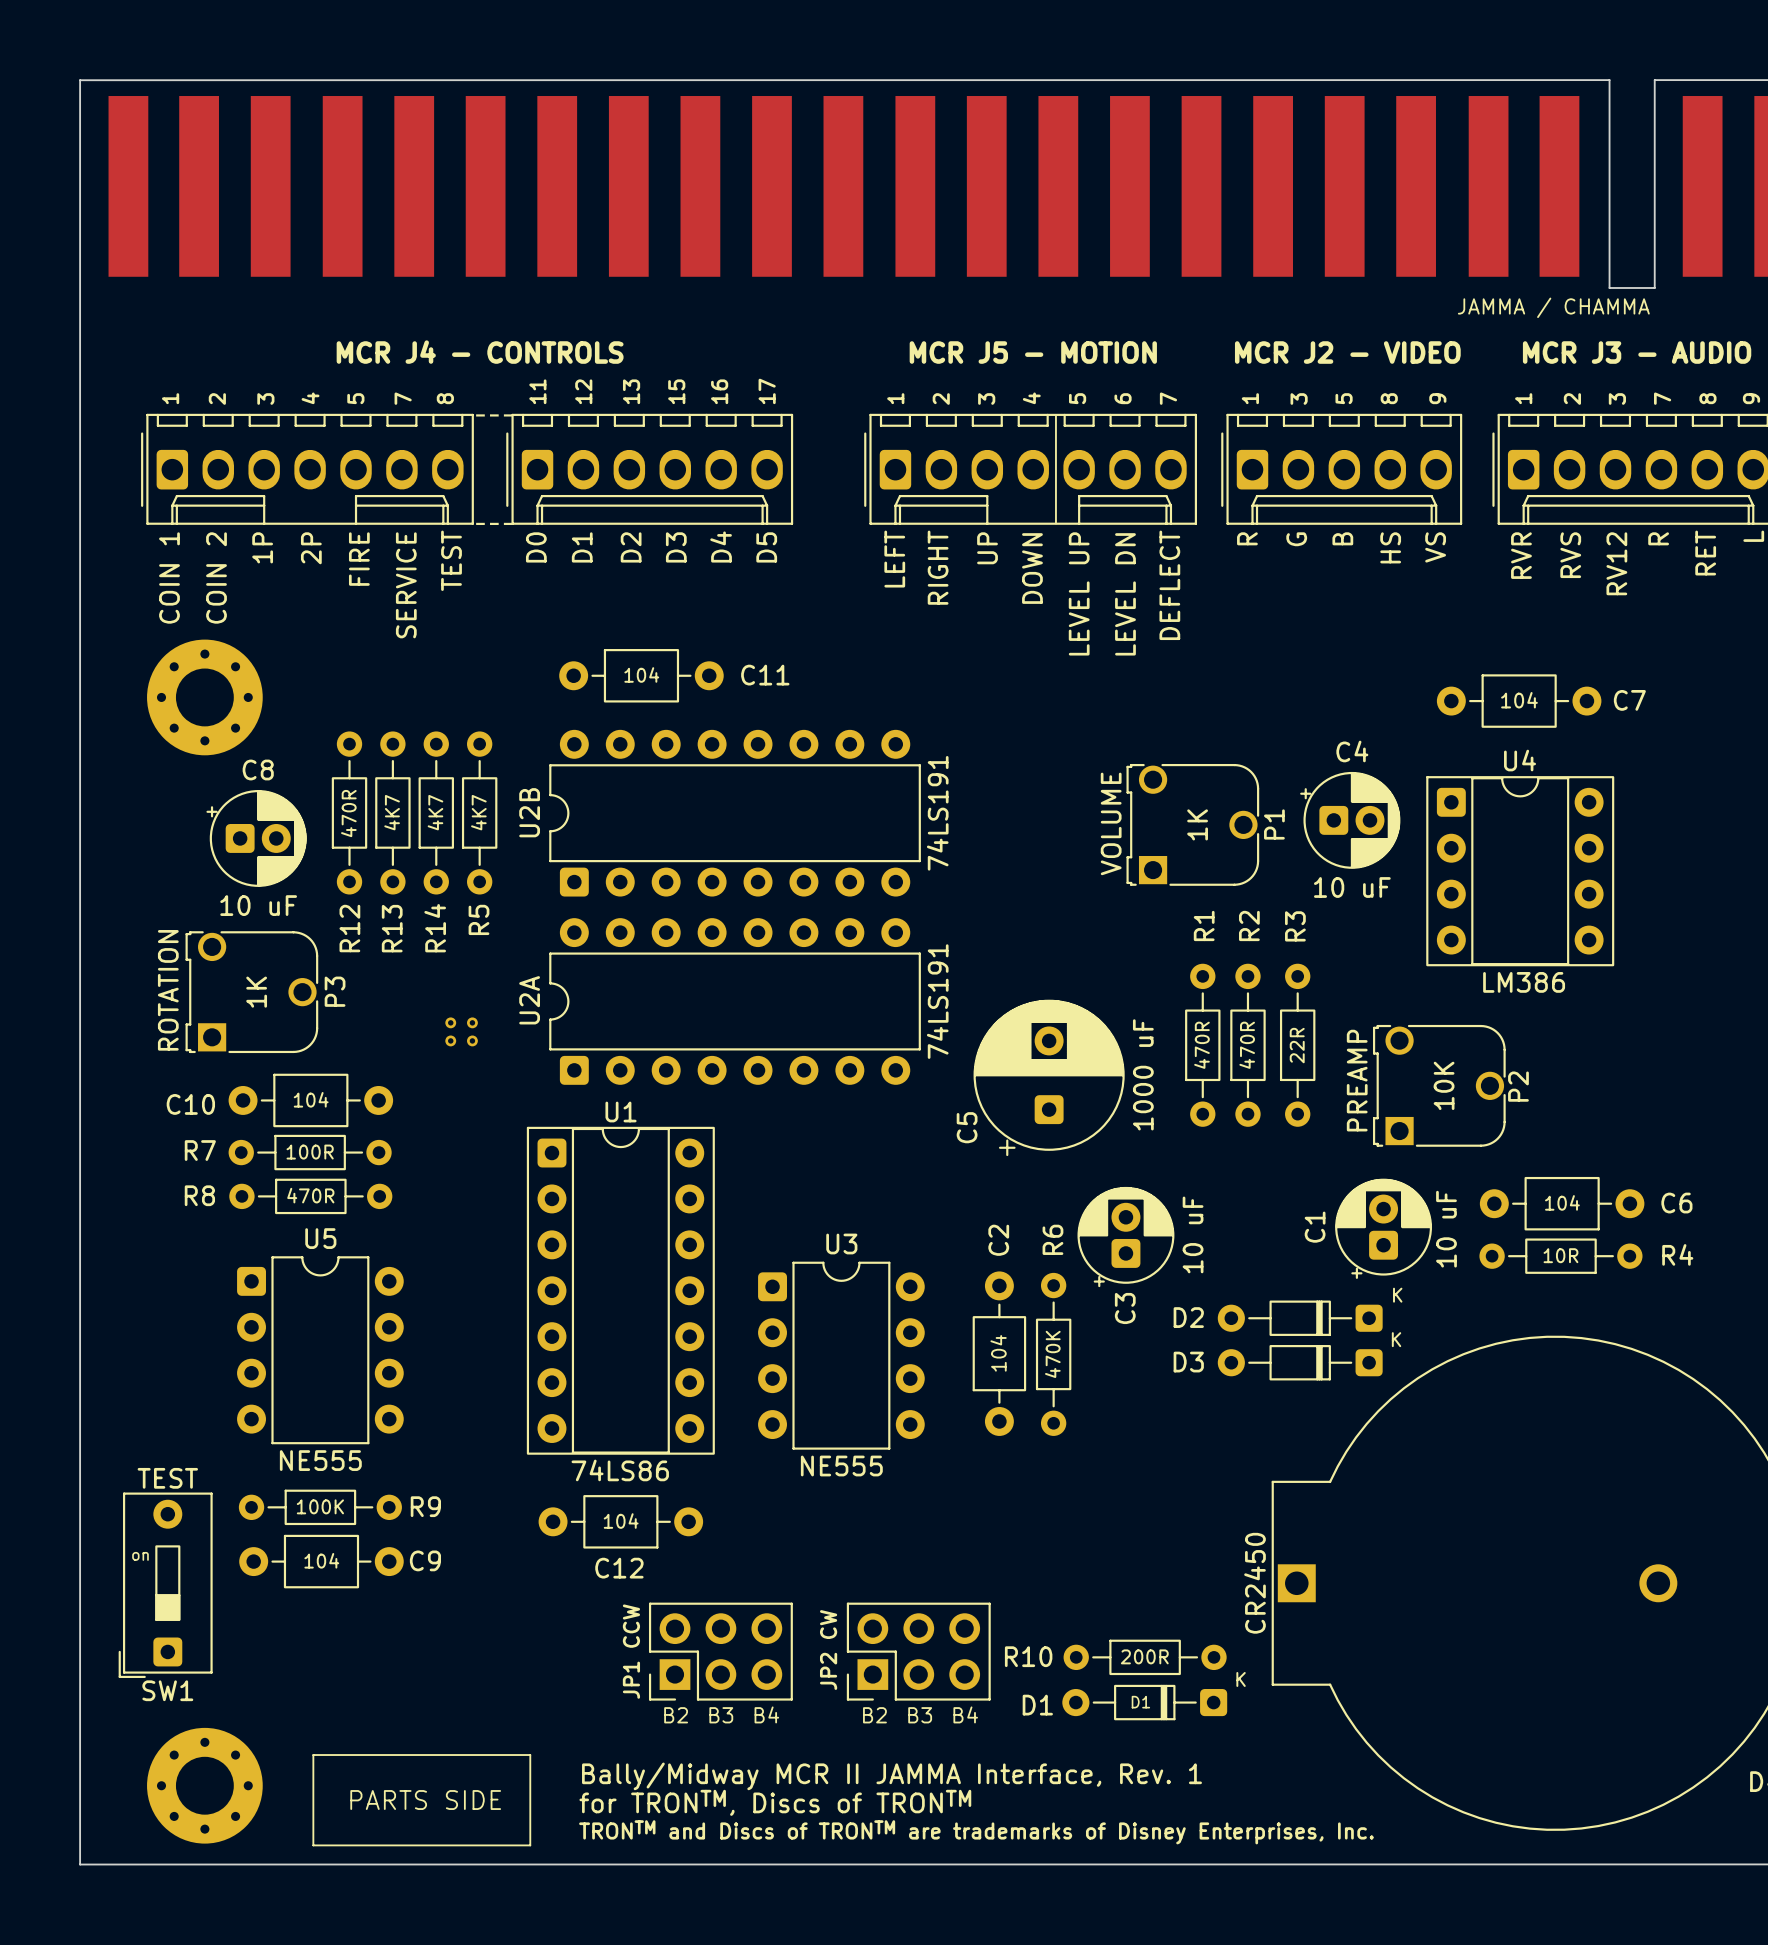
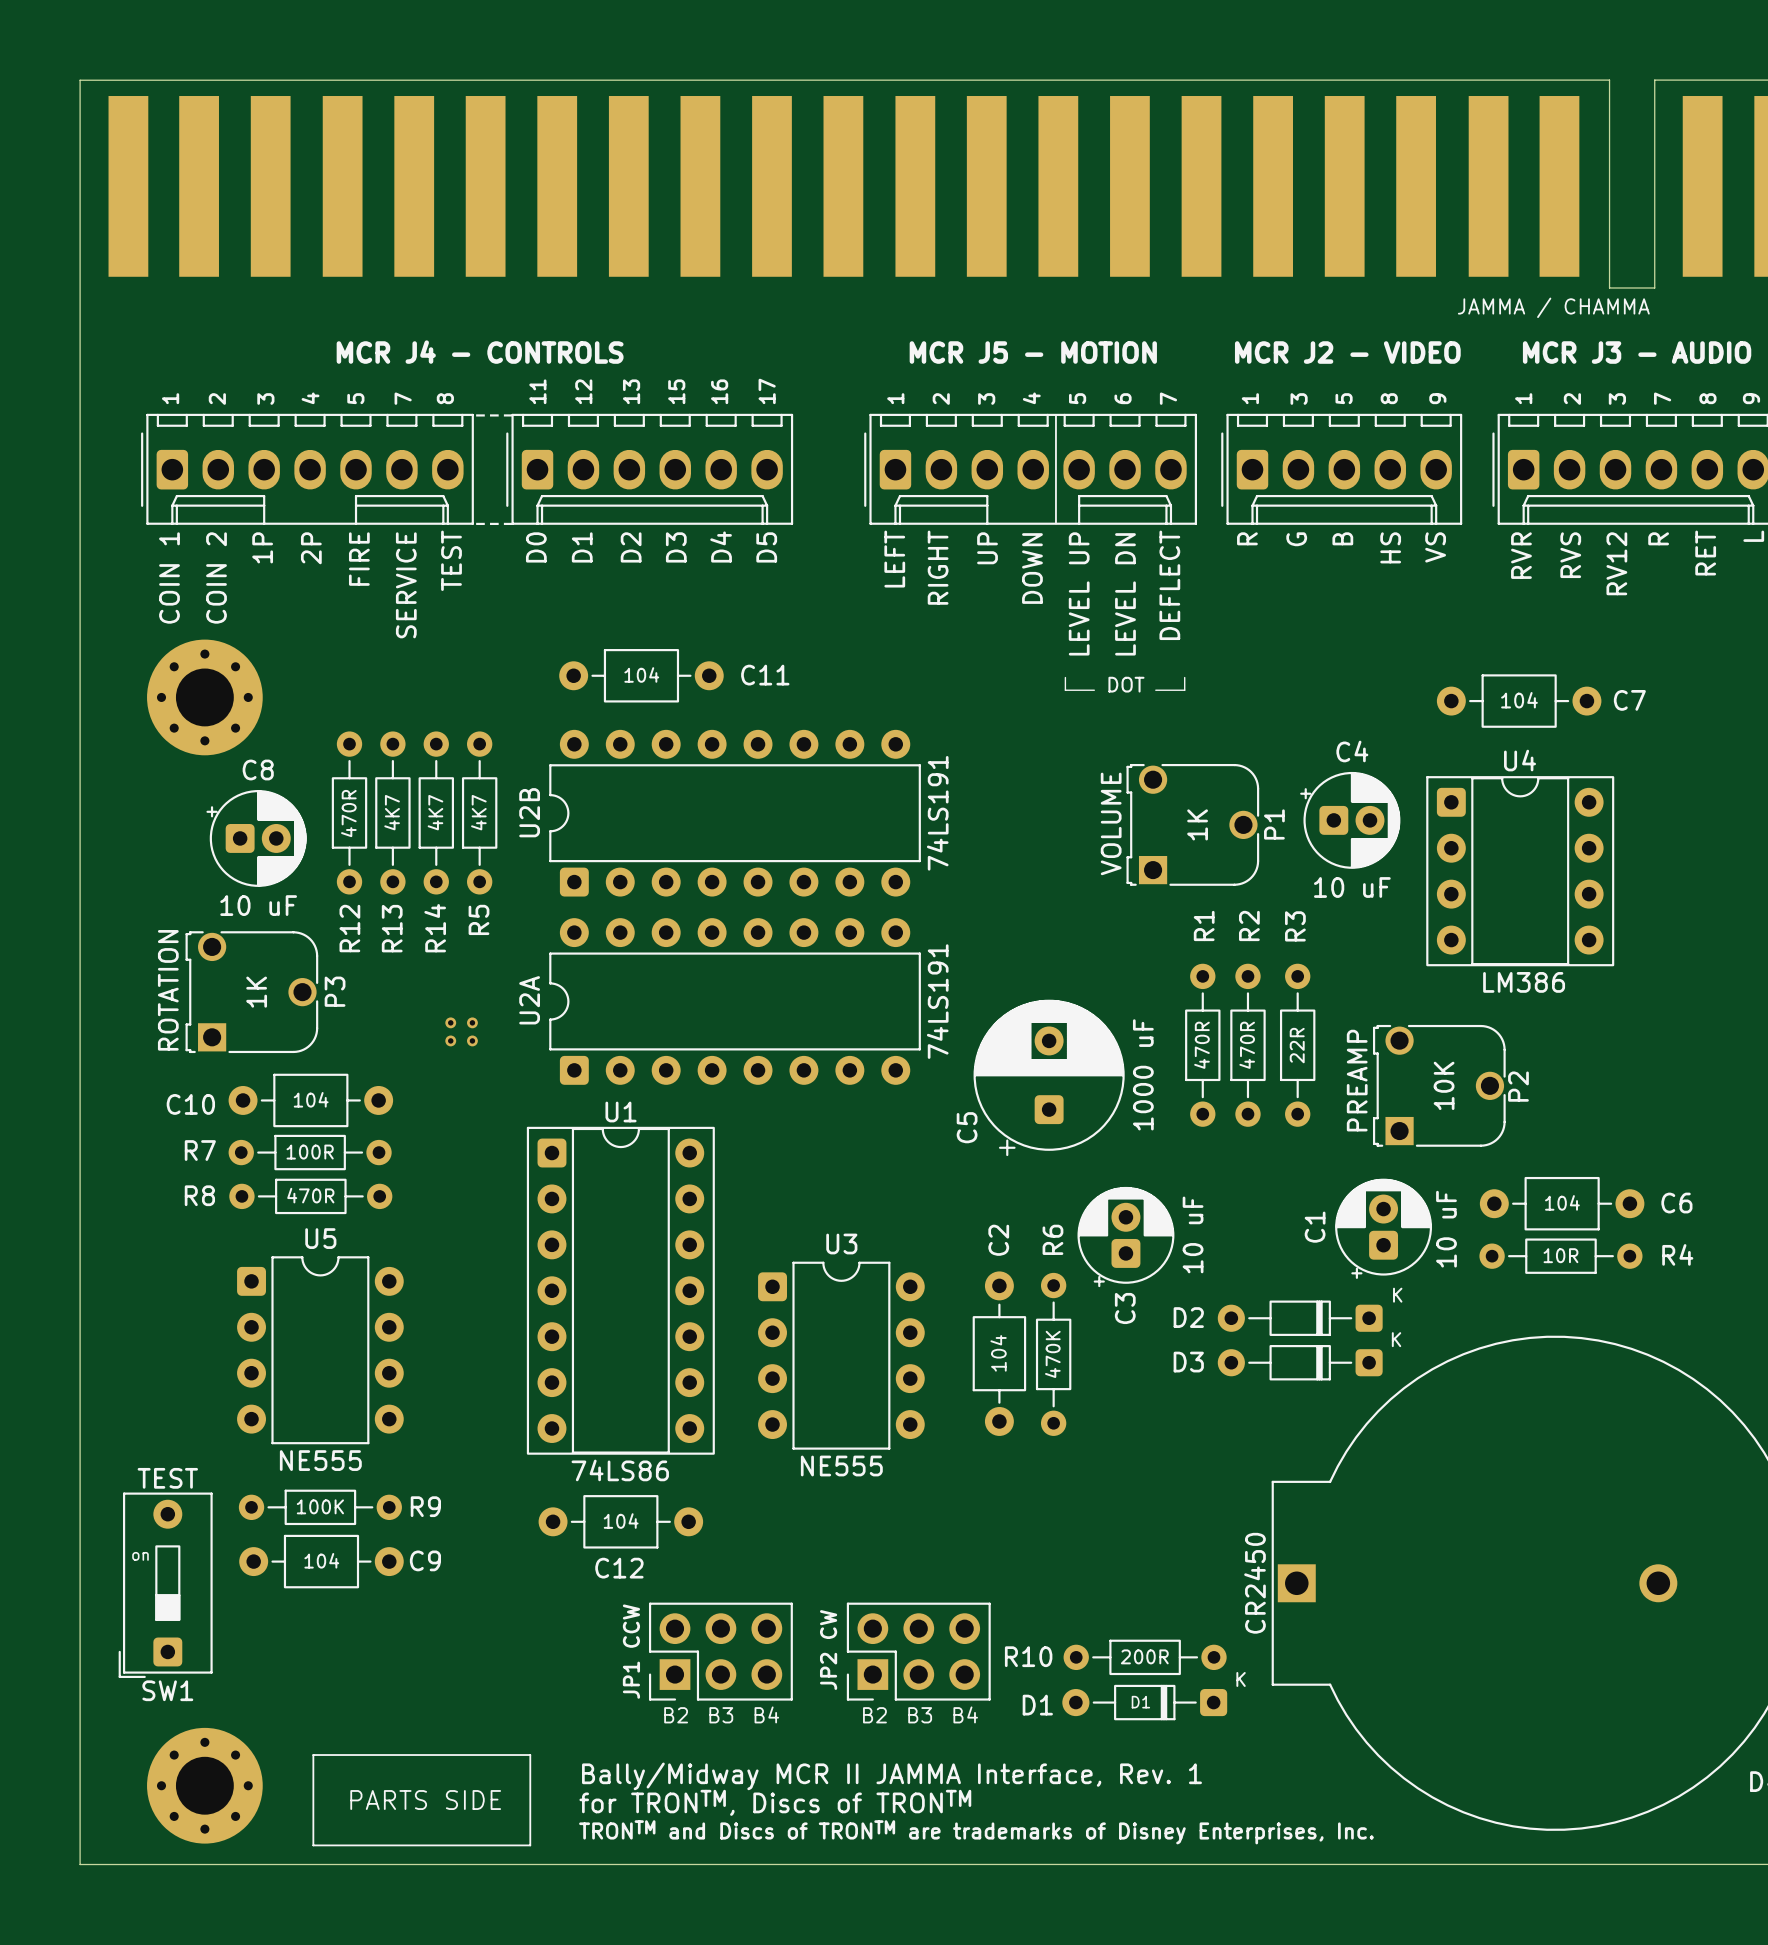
line: none -> (1065, 677) (1065, 690) (1094, 690)
line: none -> (1184, 677) (1184, 690) (1155, 690)
text: none -> DOT (1126, 684)

